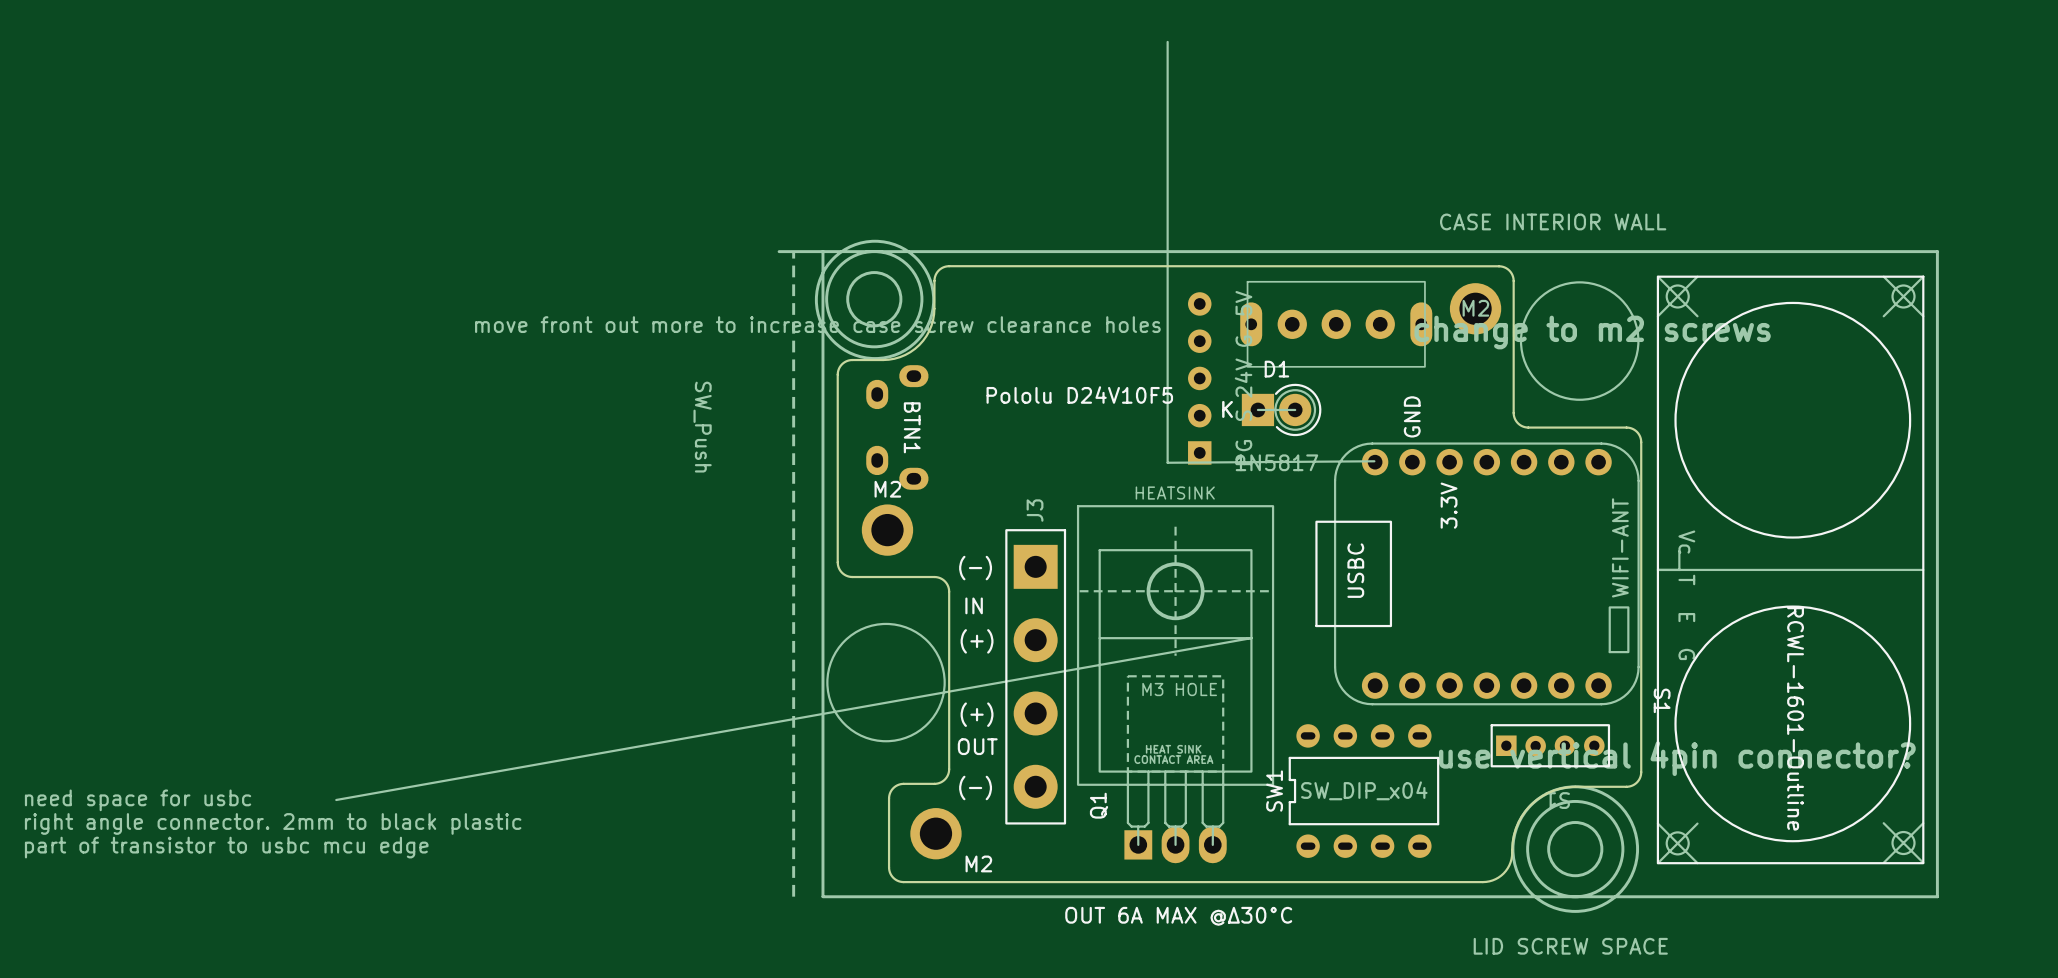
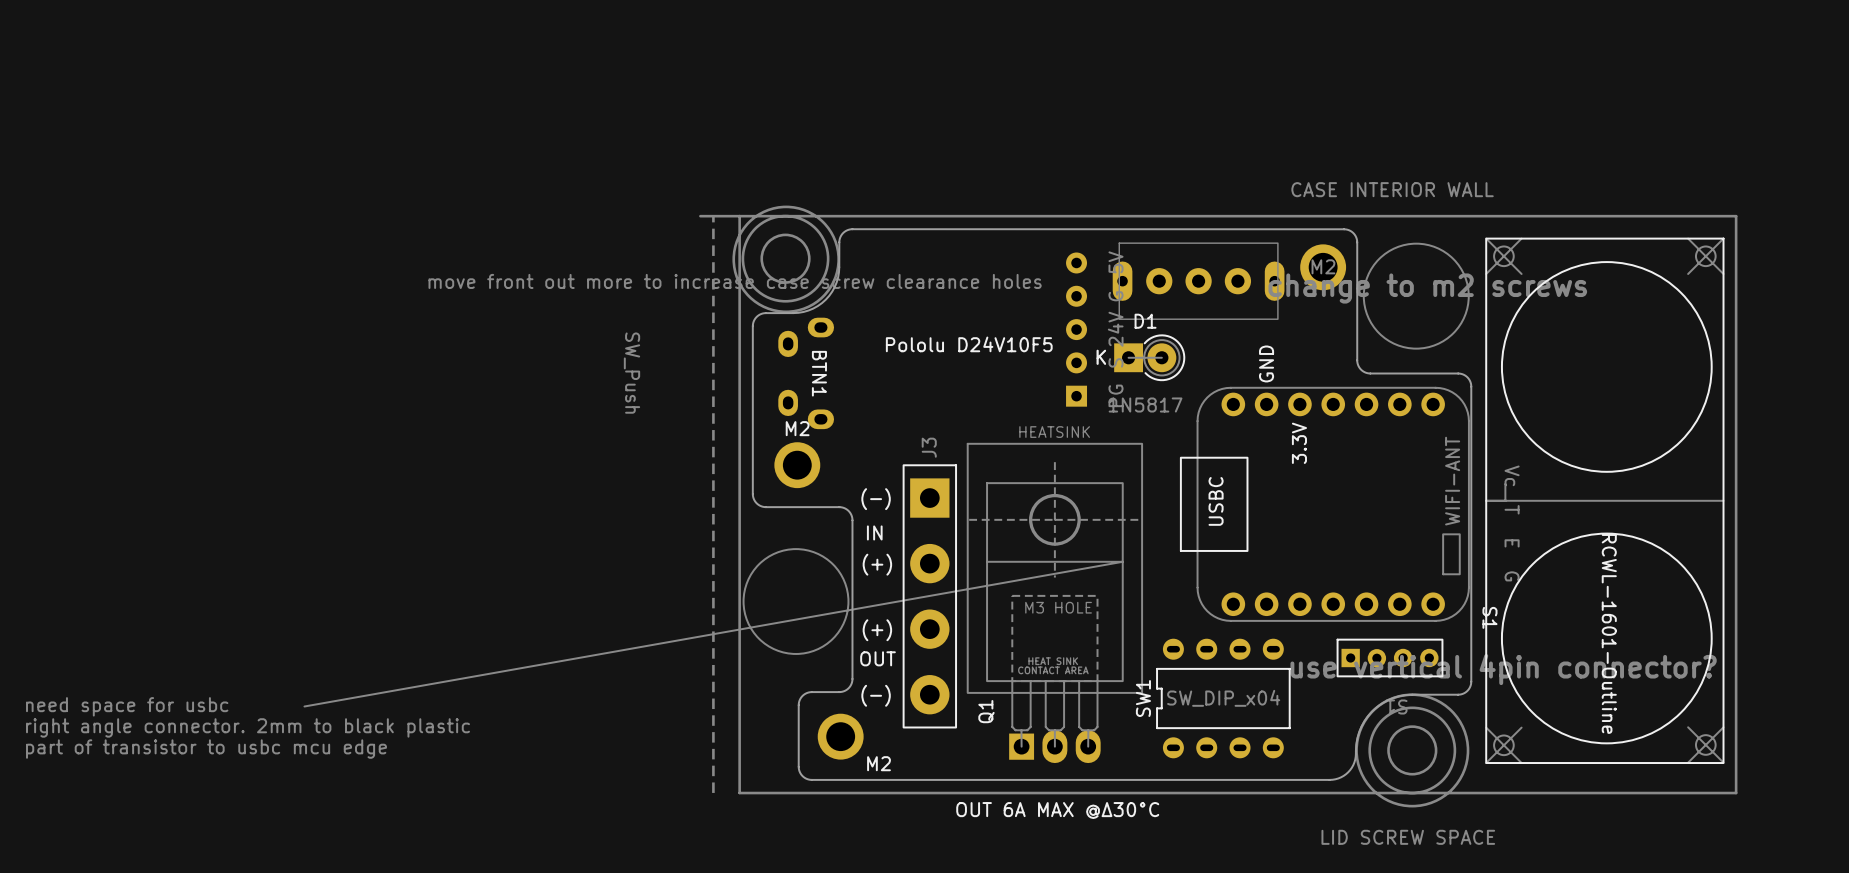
line: (1167, 41) (1167, 462) (1374, 461) -> none

